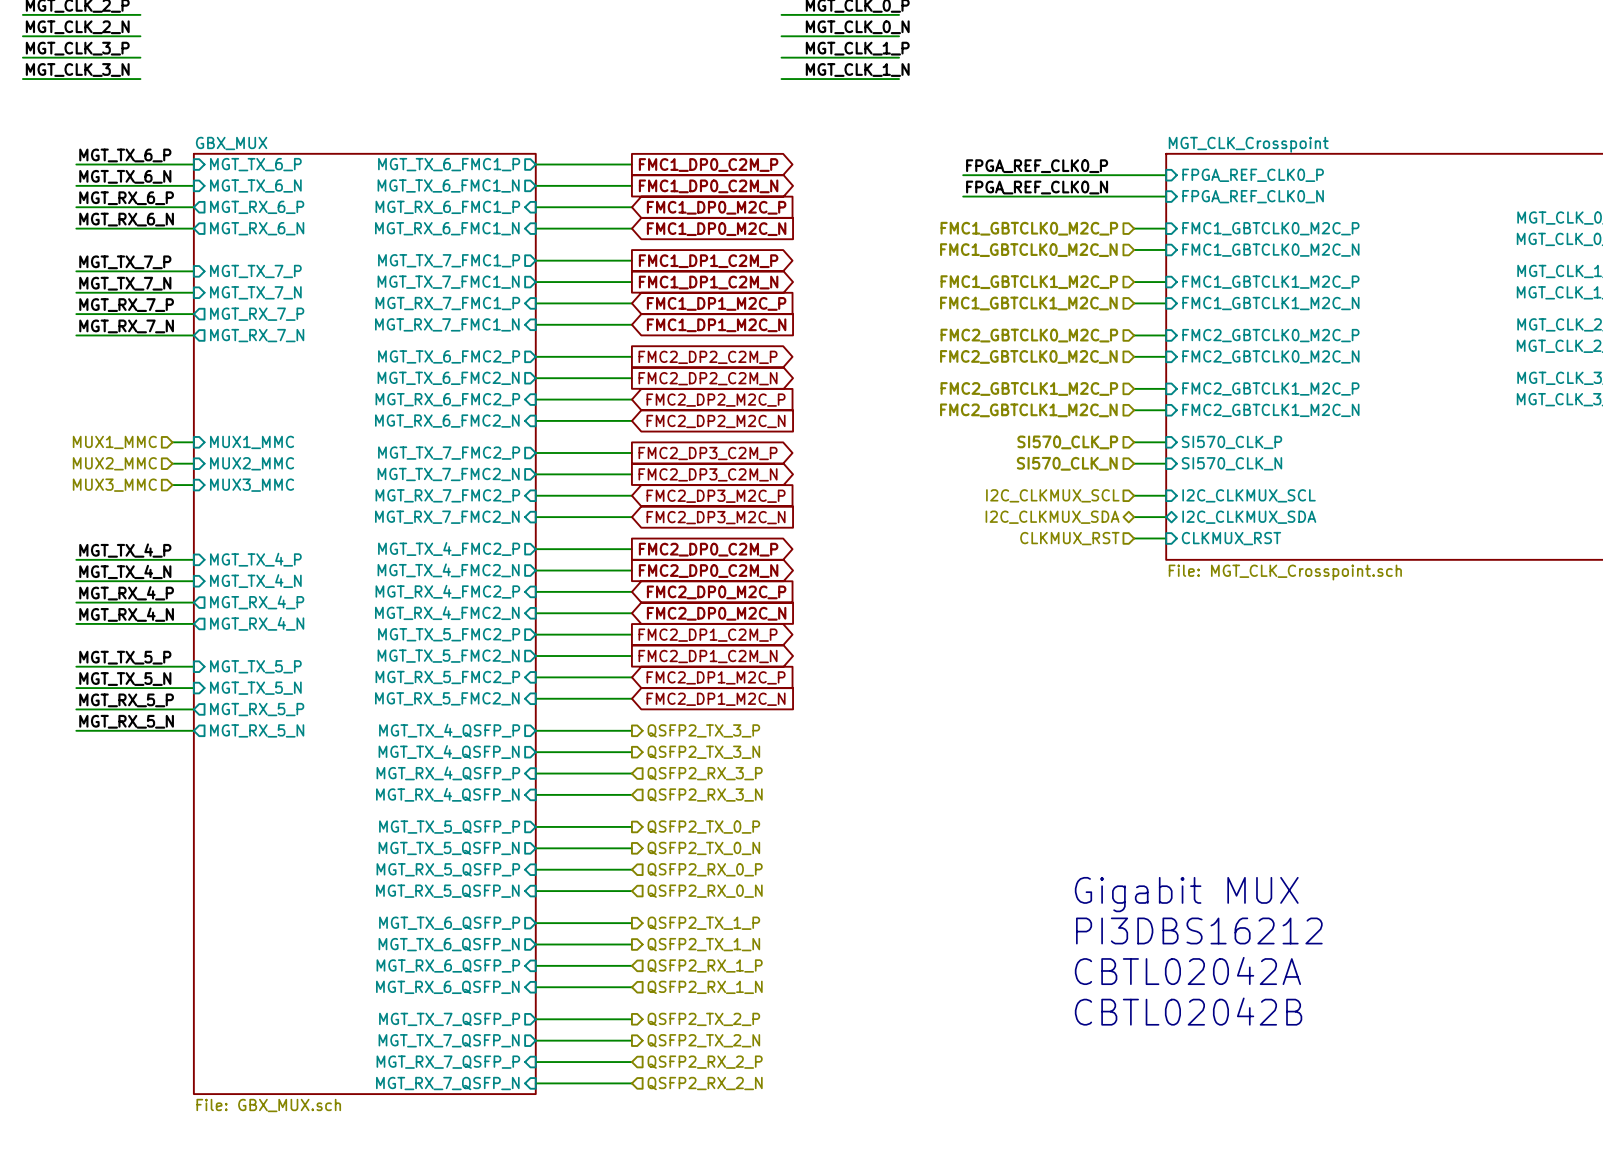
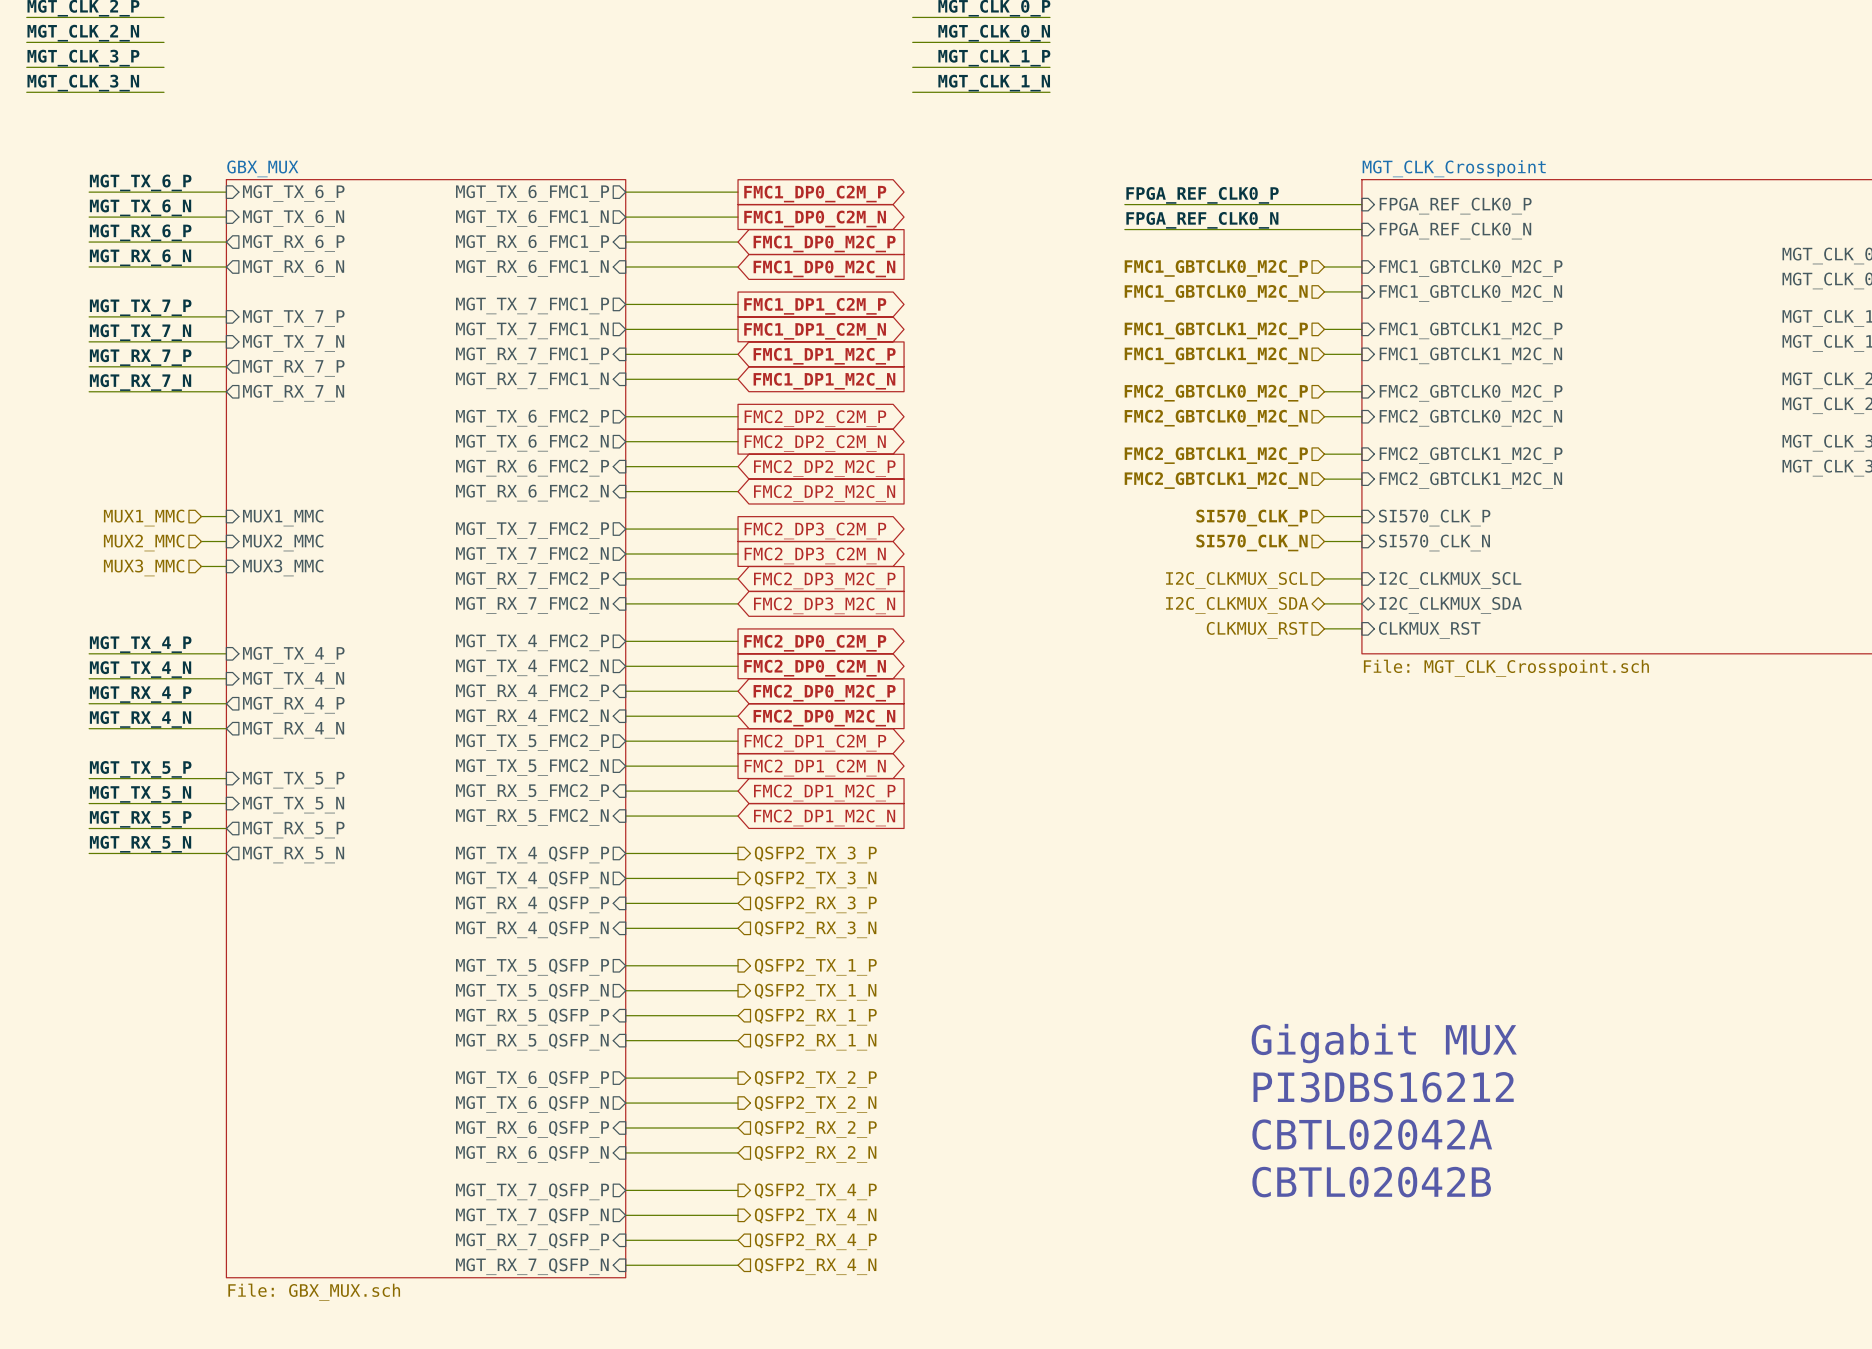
hierarchical label: QSFP2_TX_0_P (703, 827) -> QSFP2_TX_1_P (815, 967)
hierarchical label: QSFP2_TX_0_N (703, 848) -> QSFP2_TX_1_N (815, 992)
hierarchical label: QSFP2_RX_0_P (705, 869) -> QSFP2_RX_1_P (815, 1017)
hierarchical label: QSFP2_RX_0_N (705, 891) -> QSFP2_RX_1_N (815, 1042)
hierarchical label: QSFP2_TX_1_P (703, 923) -> QSFP2_TX_2_P (815, 1079)
hierarchical label: QSFP2_TX_1_N (703, 944) -> QSFP2_TX_2_N (815, 1104)
hierarchical label: QSFP2_RX_1_P (705, 965) -> QSFP2_RX_2_P (815, 1129)
hierarchical label: QSFP2_RX_1_N (705, 987) -> QSFP2_RX_2_N (815, 1154)
hierarchical label: QSFP2_TX_2_P (703, 1019) -> QSFP2_TX_4_P (815, 1191)
hierarchical label: QSFP2_TX_2_N (703, 1040) -> QSFP2_TX_4_N (815, 1216)
hierarchical label: QSFP2_RX_2_P (705, 1062) -> QSFP2_RX_4_P (815, 1241)
hierarchical label: QSFP2_RX_2_N (705, 1083) -> QSFP2_RX_4_N (815, 1266)

